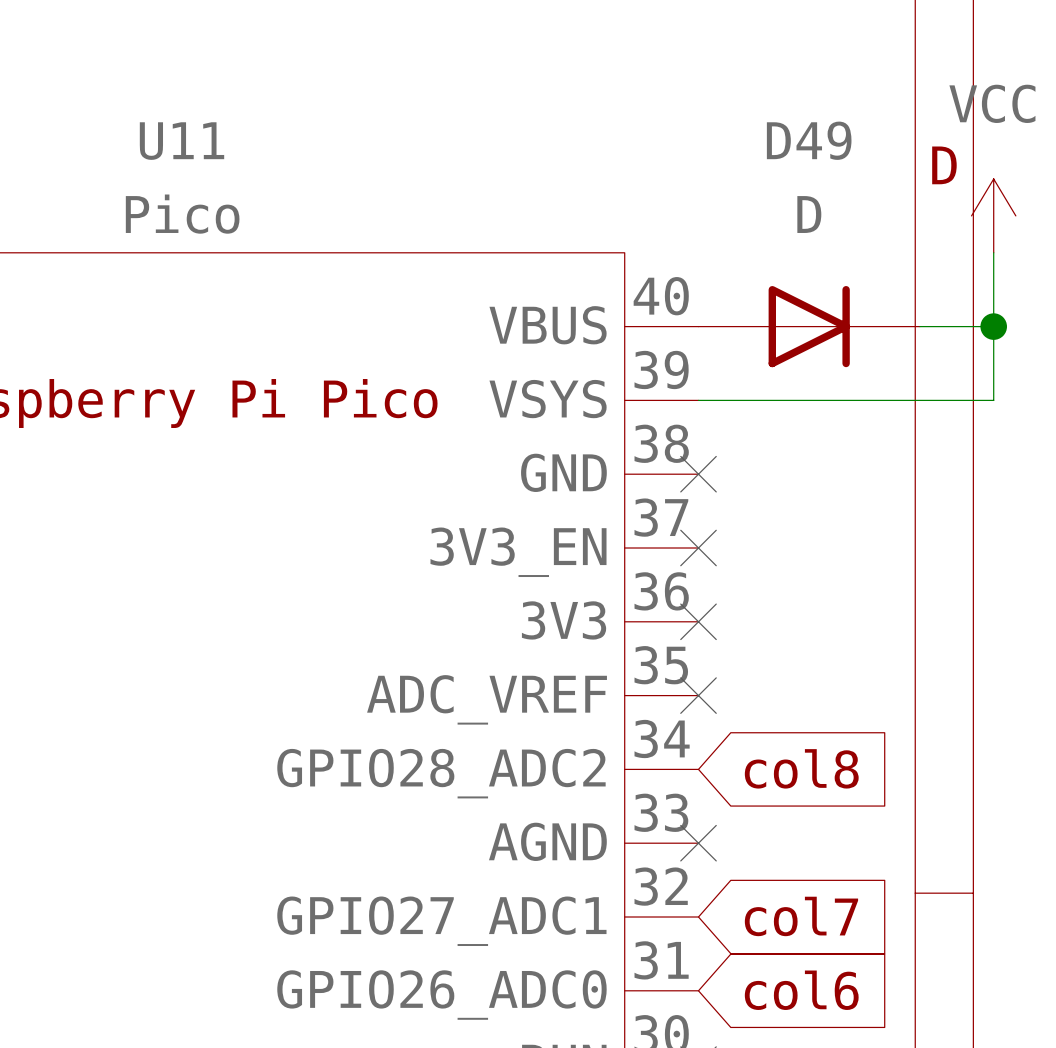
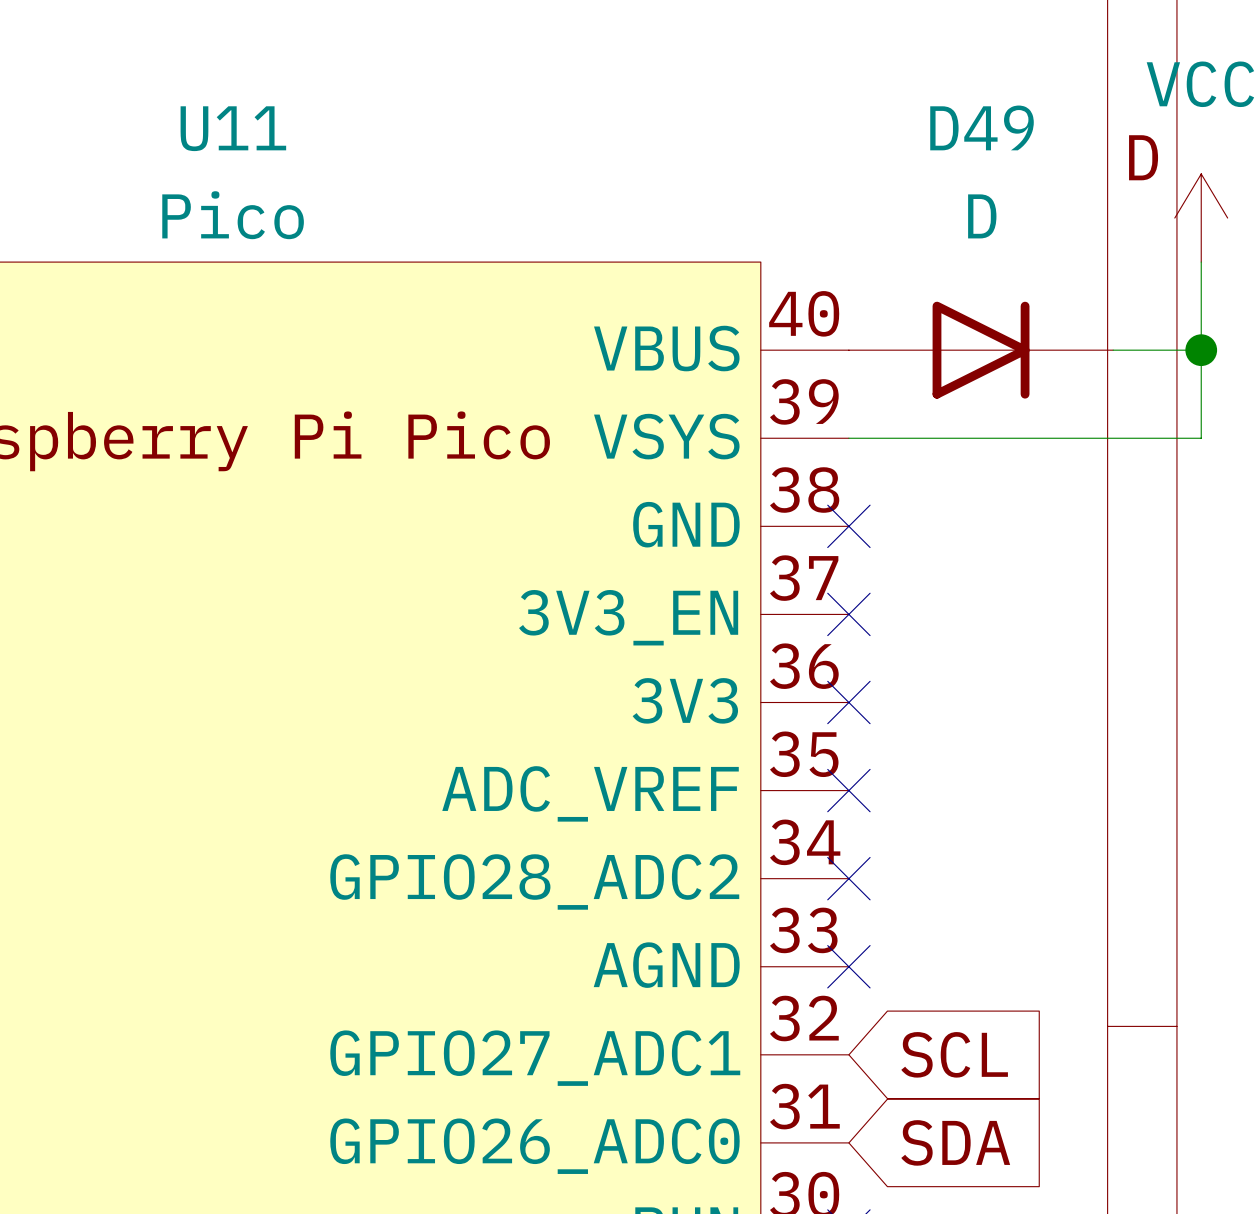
global label: col8 (801, 768) -> none
no-connect mark: none -> (848, 878)
global label: col7 (801, 916) -> SCL (954, 1054)
global label: col6 (801, 990) -> SDA (955, 1142)

